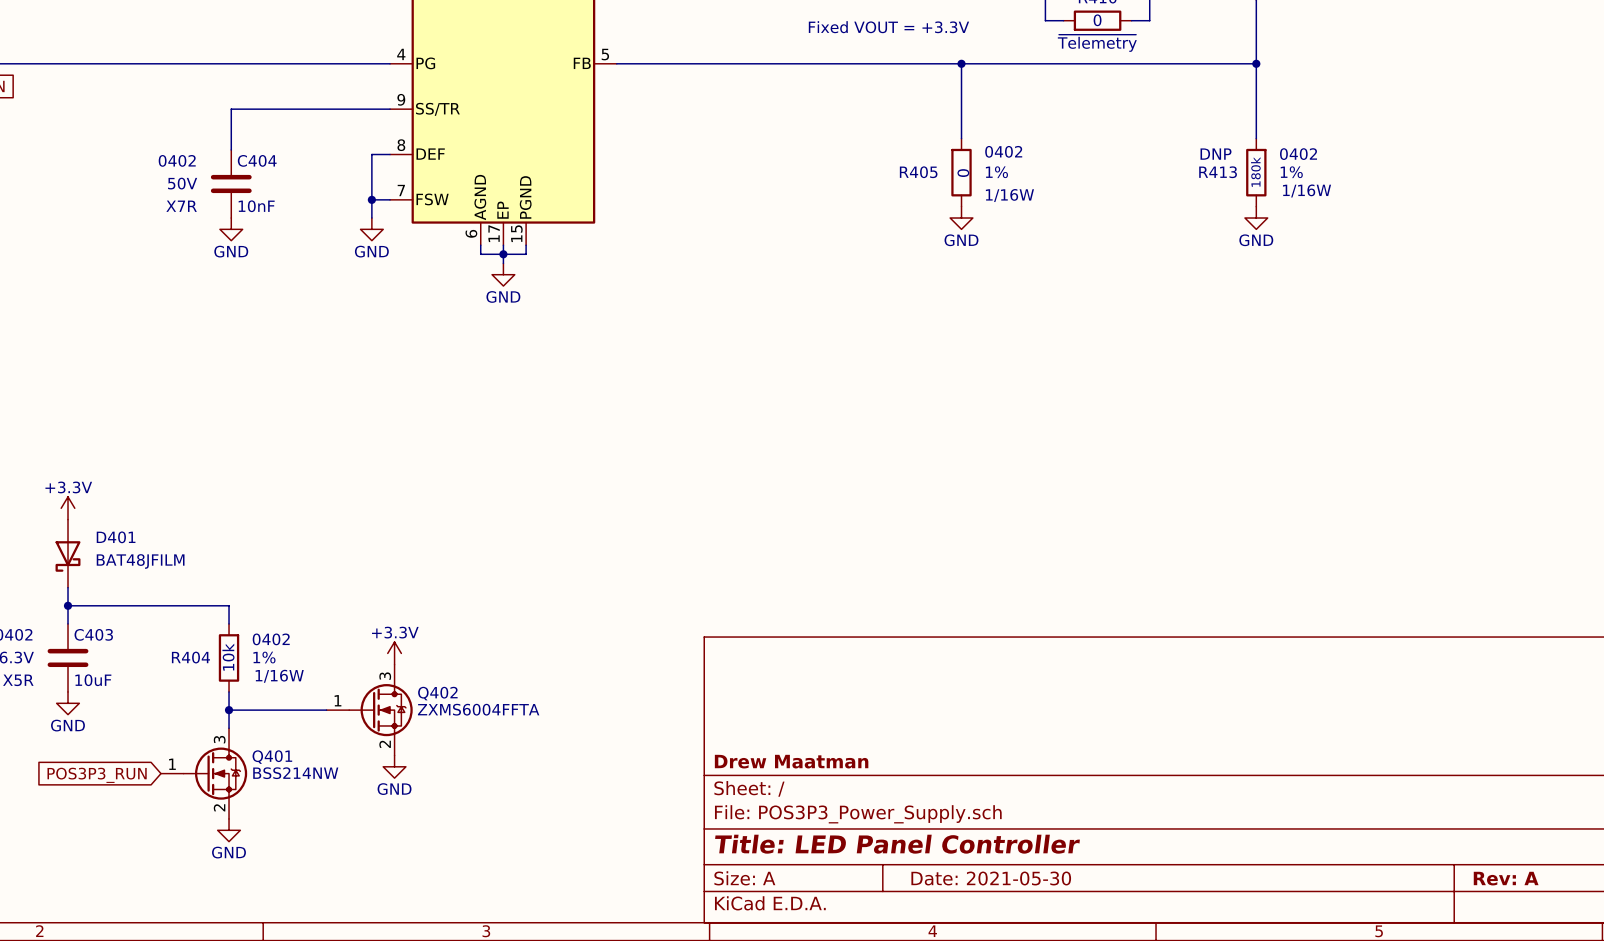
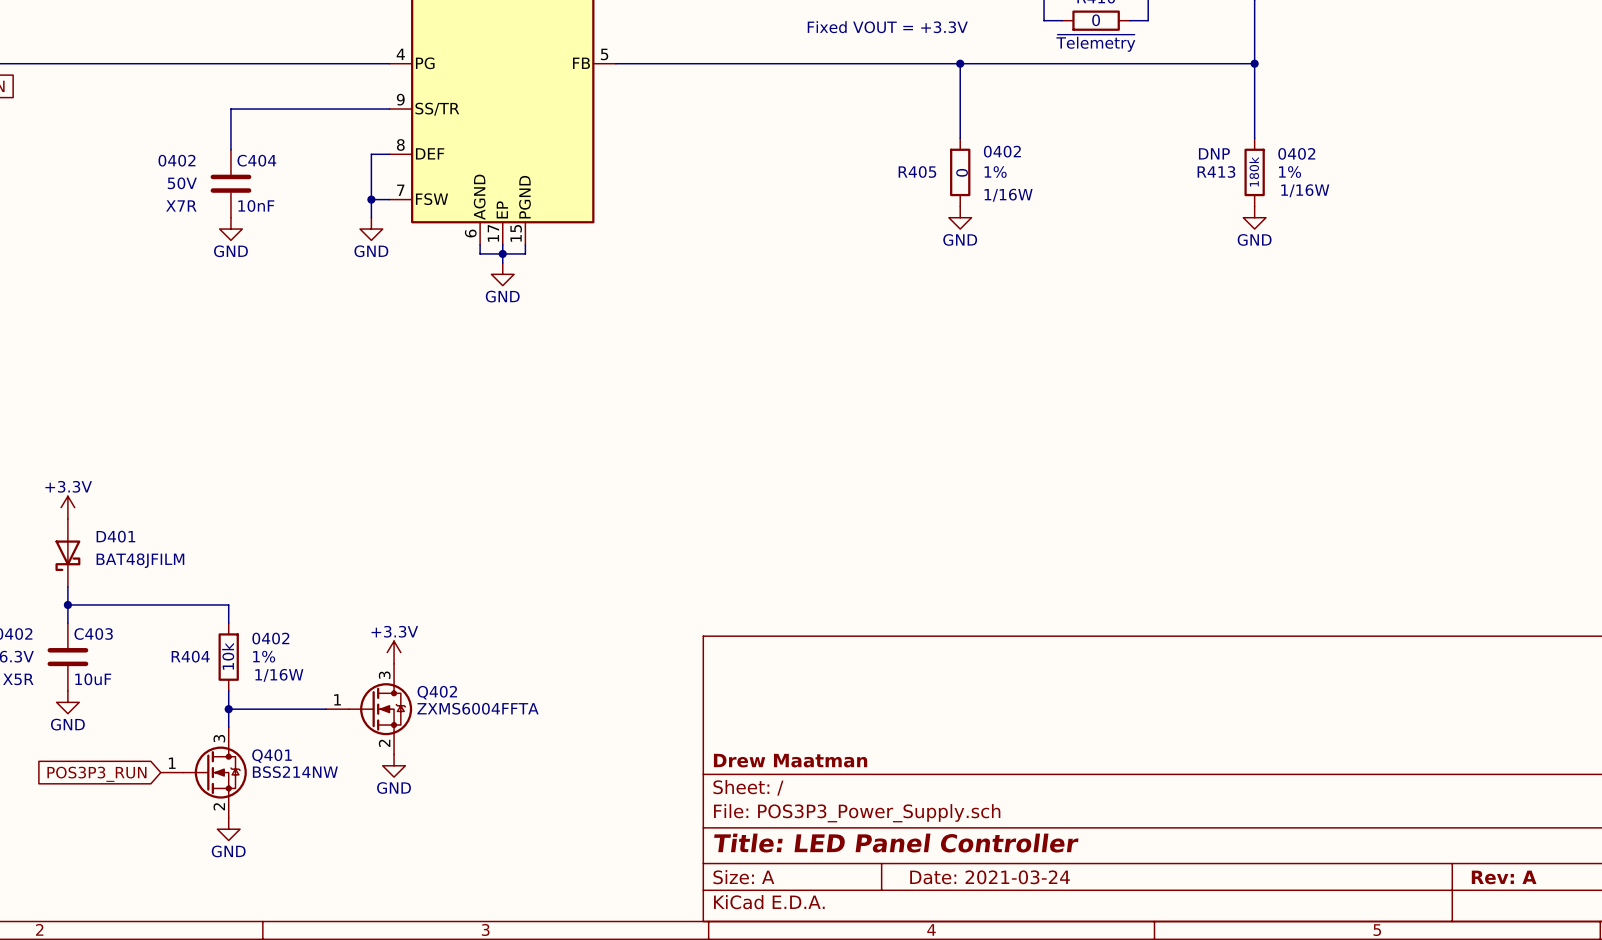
title block: Date: 2021-05-30 (991, 878) -> Date: 2021-03-24 (990, 877)

